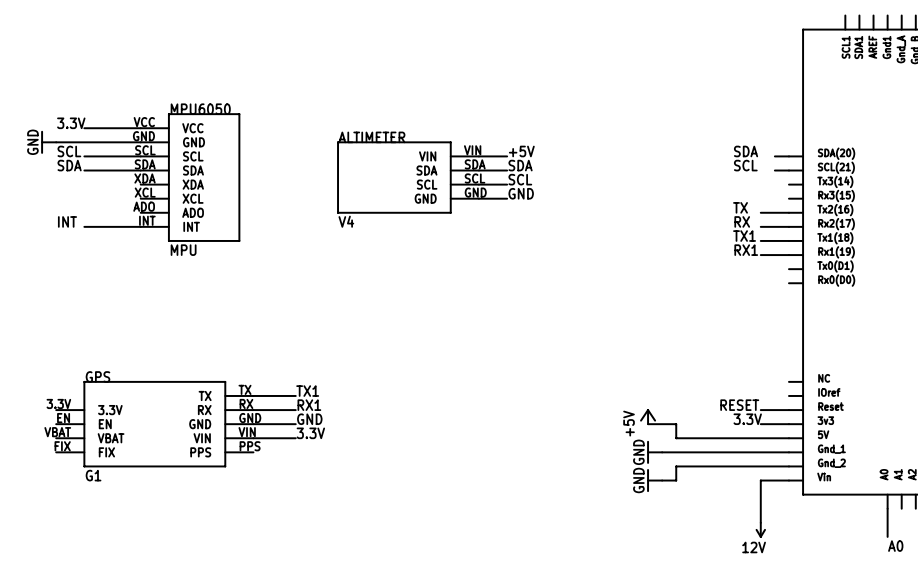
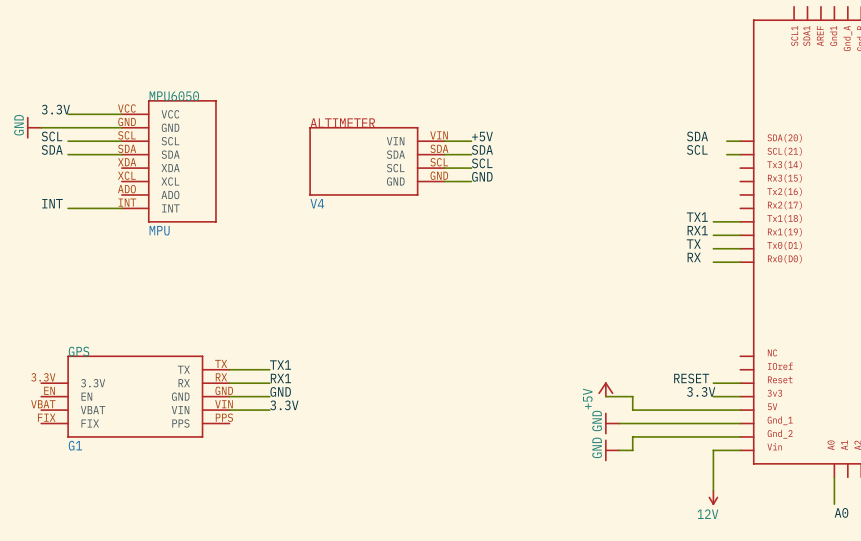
label position: TX (740, 207) -> TX (693, 244)
wire: (760, 212) (788, 212) -> (713, 262) (740, 262)
label position: RX (742, 221) -> RX (694, 257)
wire: (760, 226) (788, 226) -> (713, 248) (740, 248)

